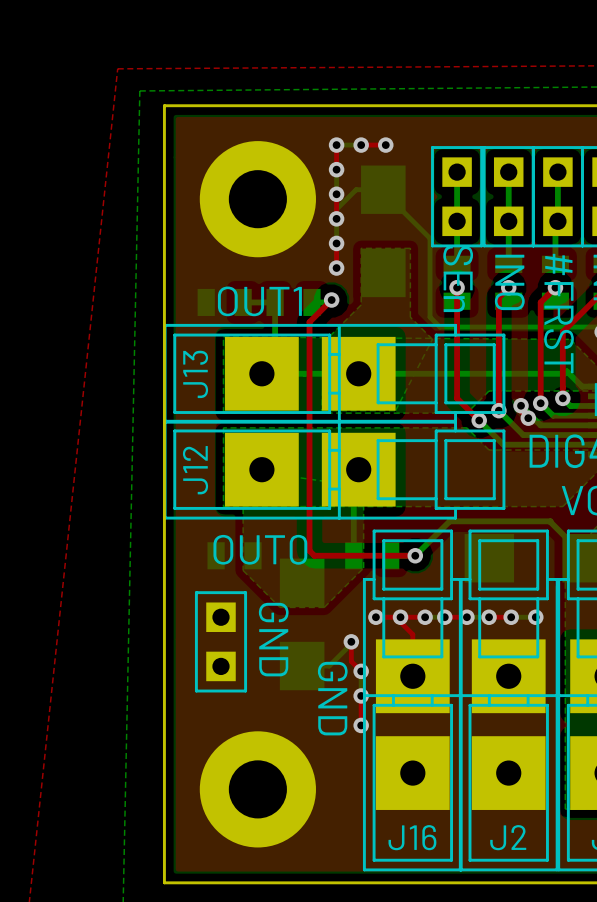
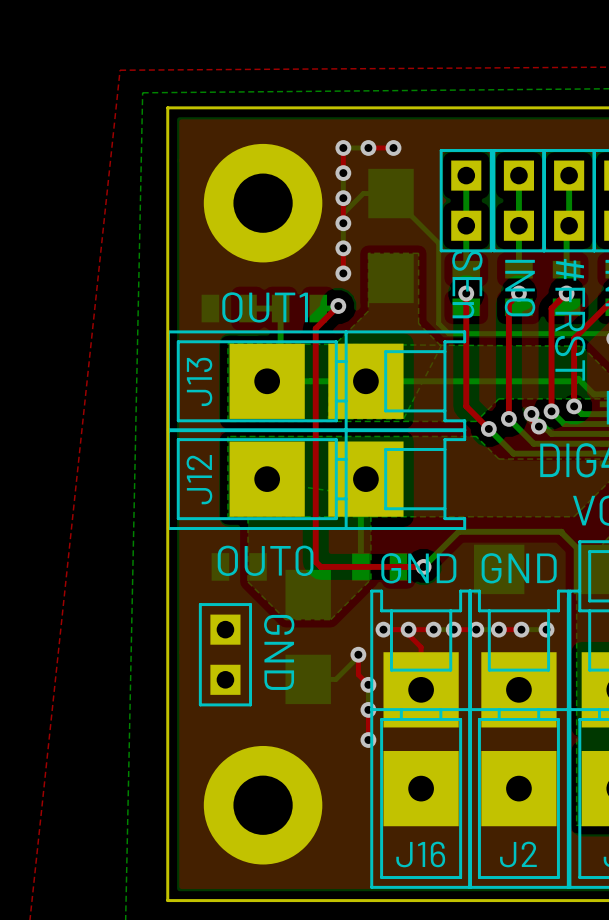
J13 footprint: [163, 323, 506, 424] -> [166, 330, 467, 433]
J12 footprint: [163, 419, 506, 520] -> [166, 428, 467, 530]
J16 footprint: [362, 529, 463, 872] -> [370, 589, 472, 889]
J2 footprint: [458, 529, 559, 872] -> [468, 589, 570, 889]
text: none -> GND (418, 568)
text: none -> GND (519, 568)
text: GND (332, 698) -> none

